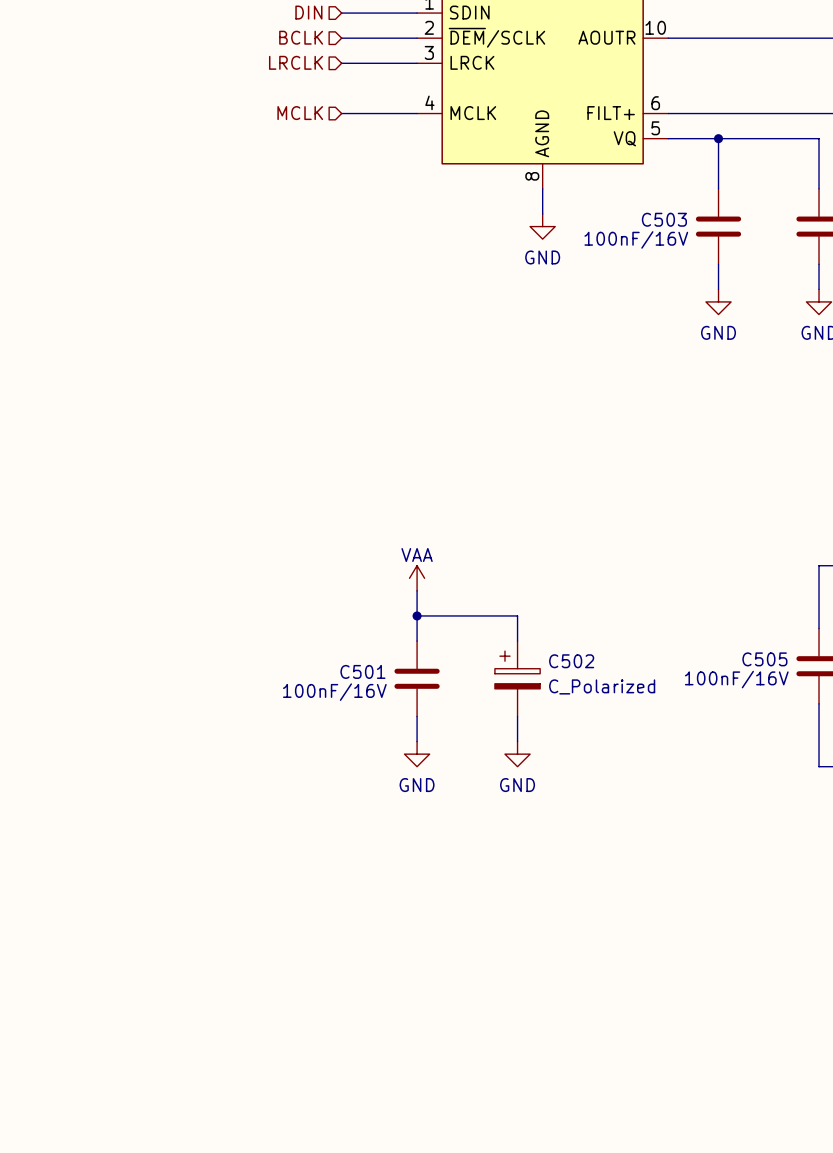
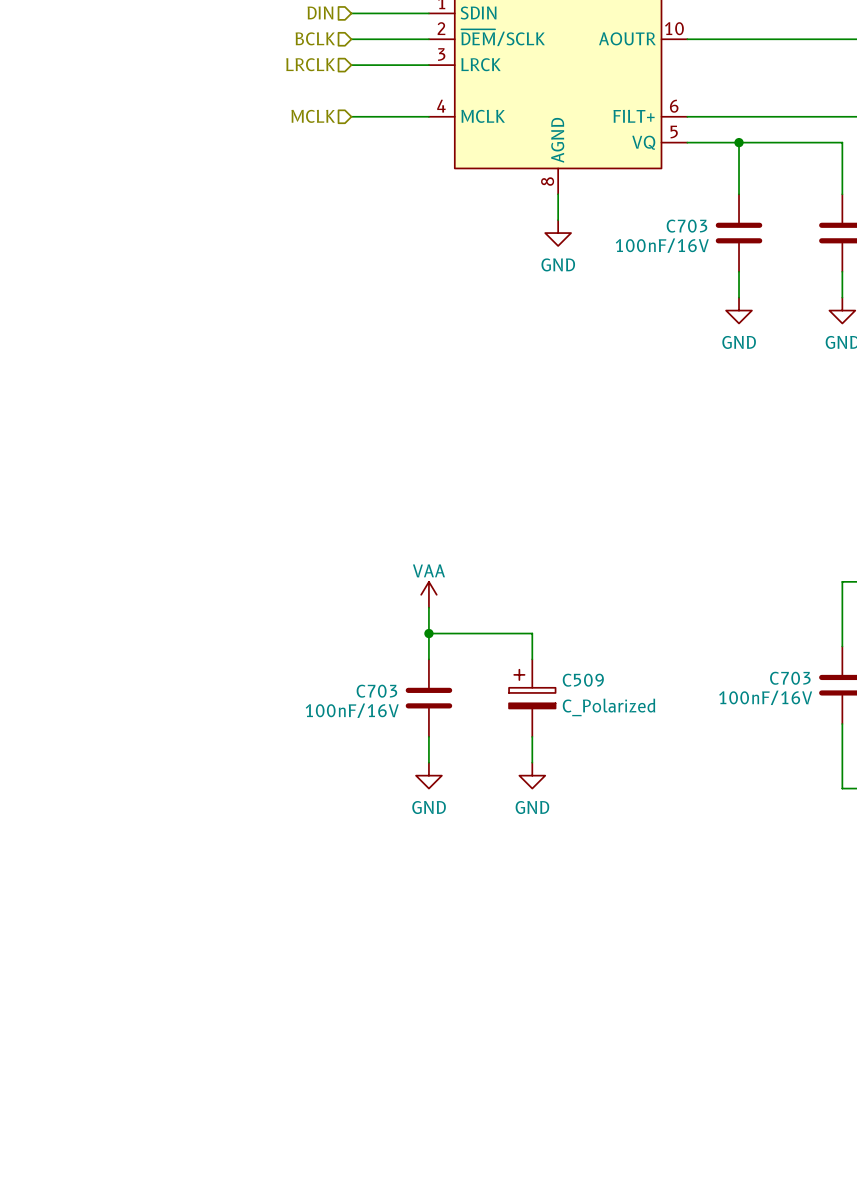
C503 name: C503 (664, 219) -> C703 (686, 226)
C505 name: C505 (764, 659) -> C703 (790, 678)
C502 name: C502 (571, 661) -> C509 (583, 680)
C501 name: C501 (362, 671) -> C703 (376, 691)

